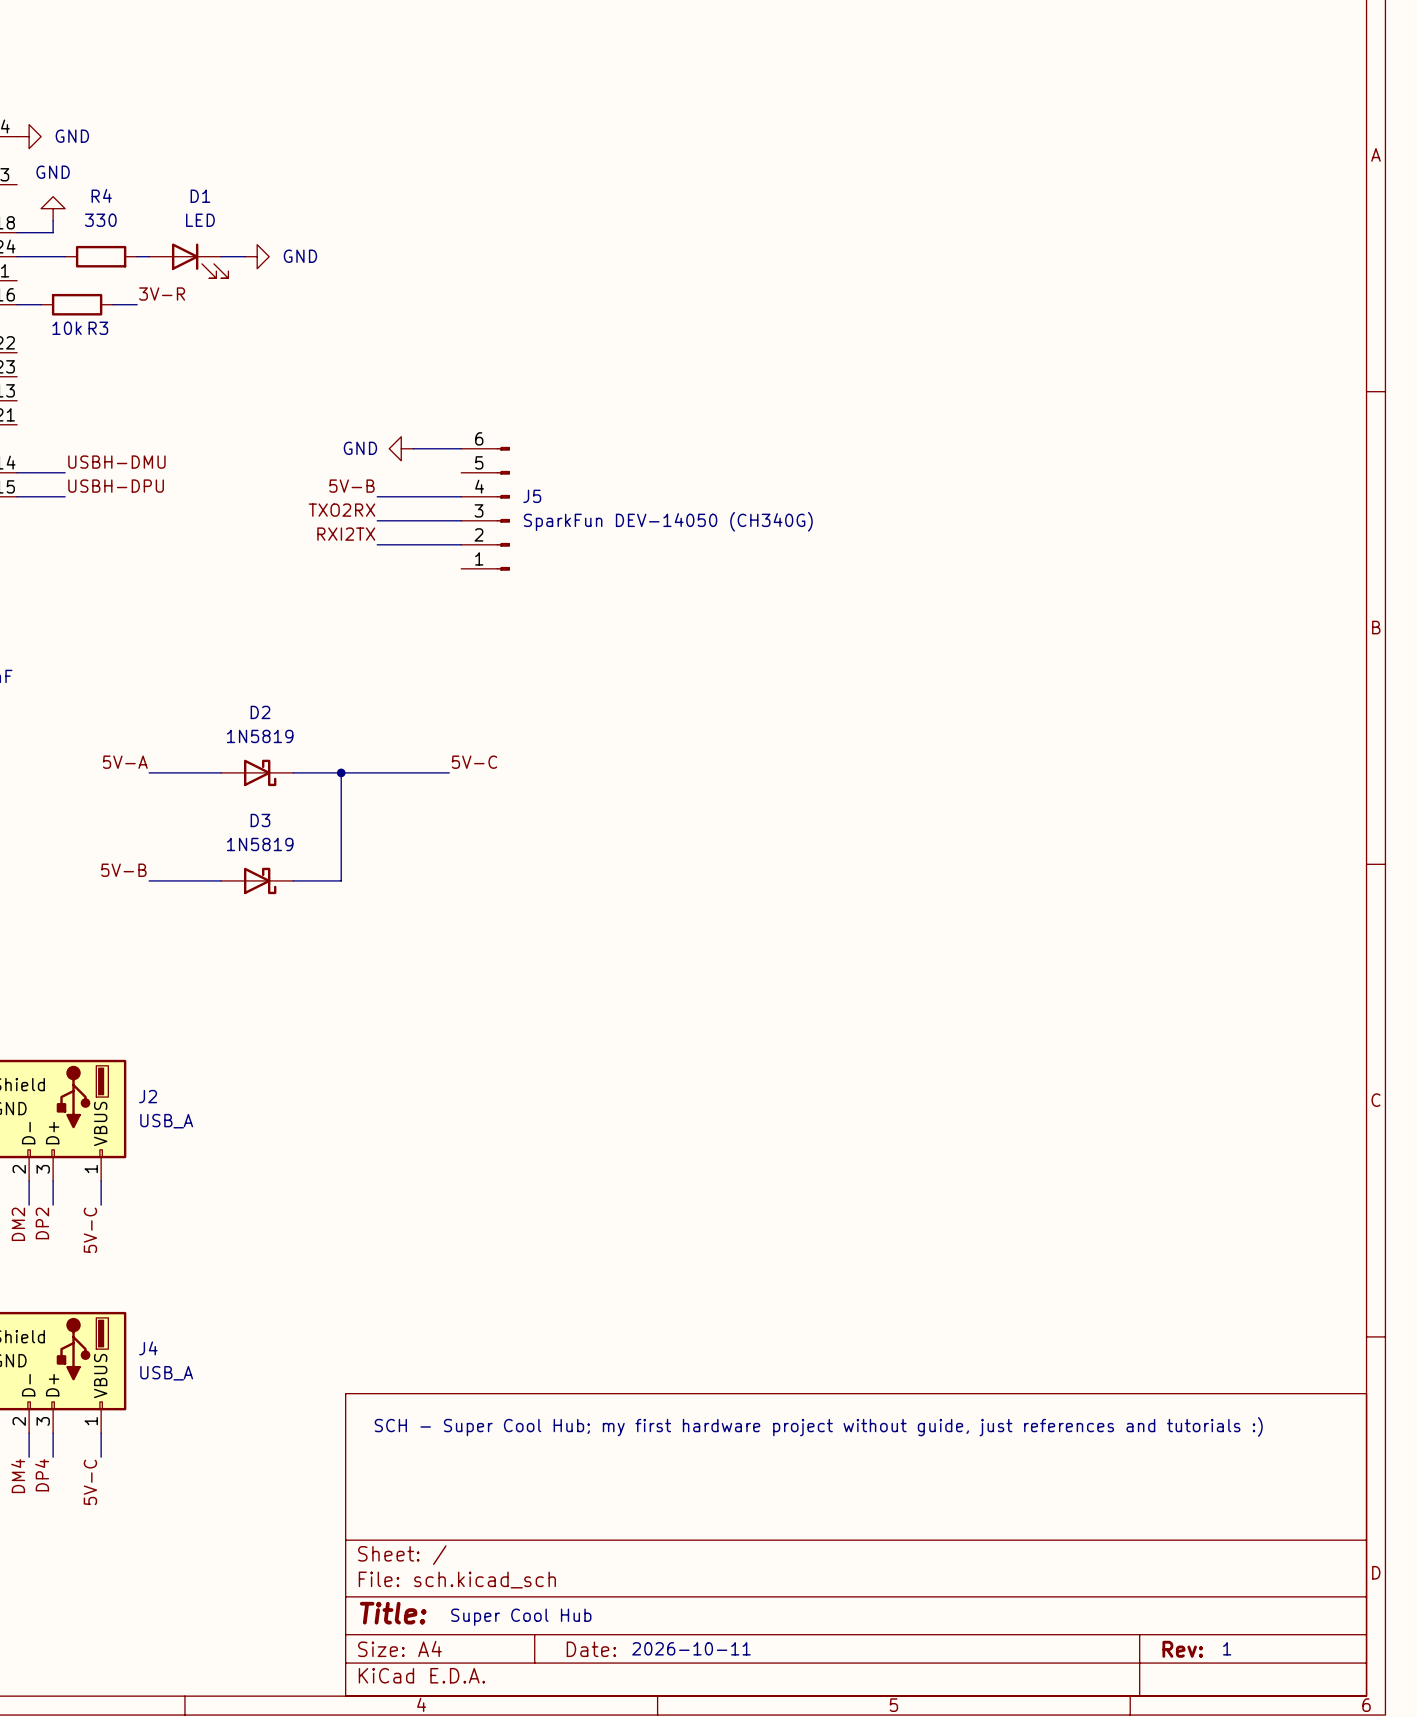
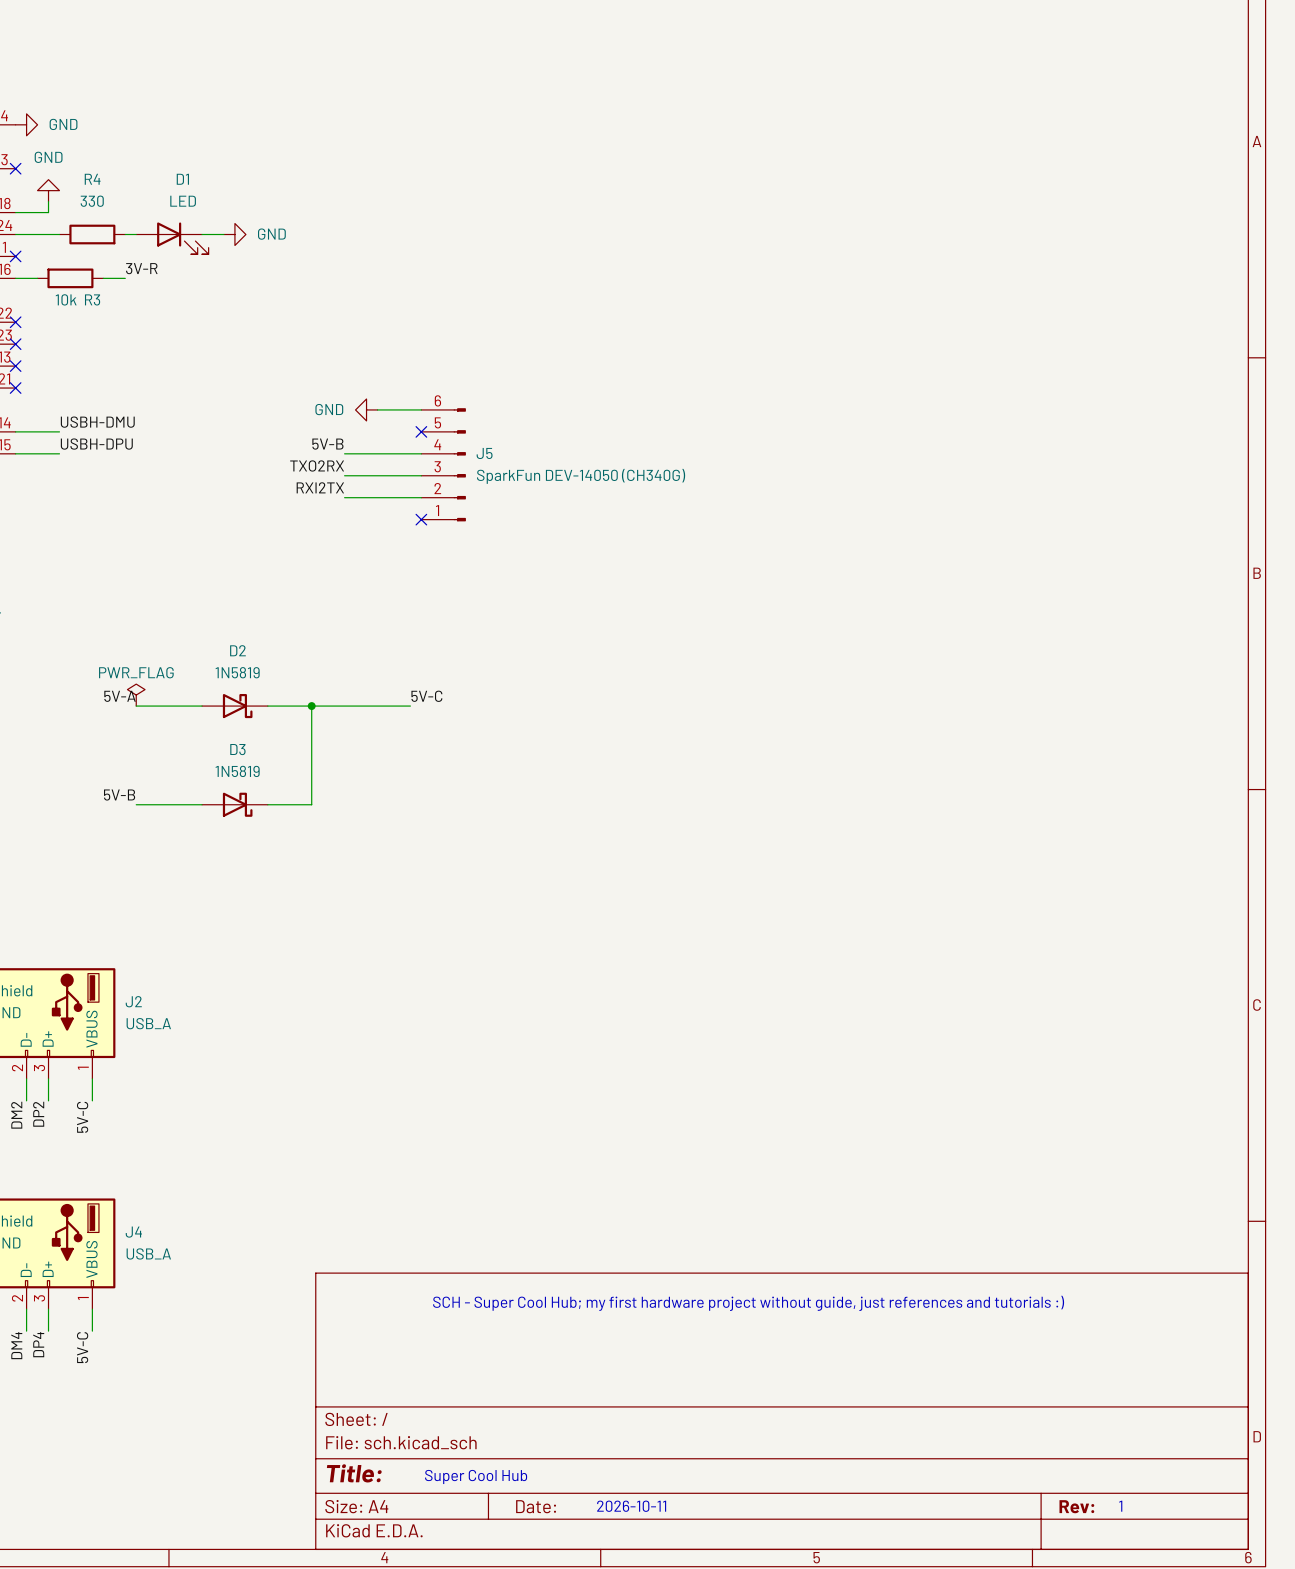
no-connect mark: none -> (15, 168)
no-connect mark: none -> (15, 256)
no-connect mark: none -> (15, 322)
no-connect mark: none -> (15, 344)
no-connect mark: none -> (15, 366)
no-connect mark: none -> (15, 388)
no-connect mark: none -> (421, 431)
no-connect mark: none -> (421, 519)
power symbol: none -> PWR_FLAG (136, 695)

